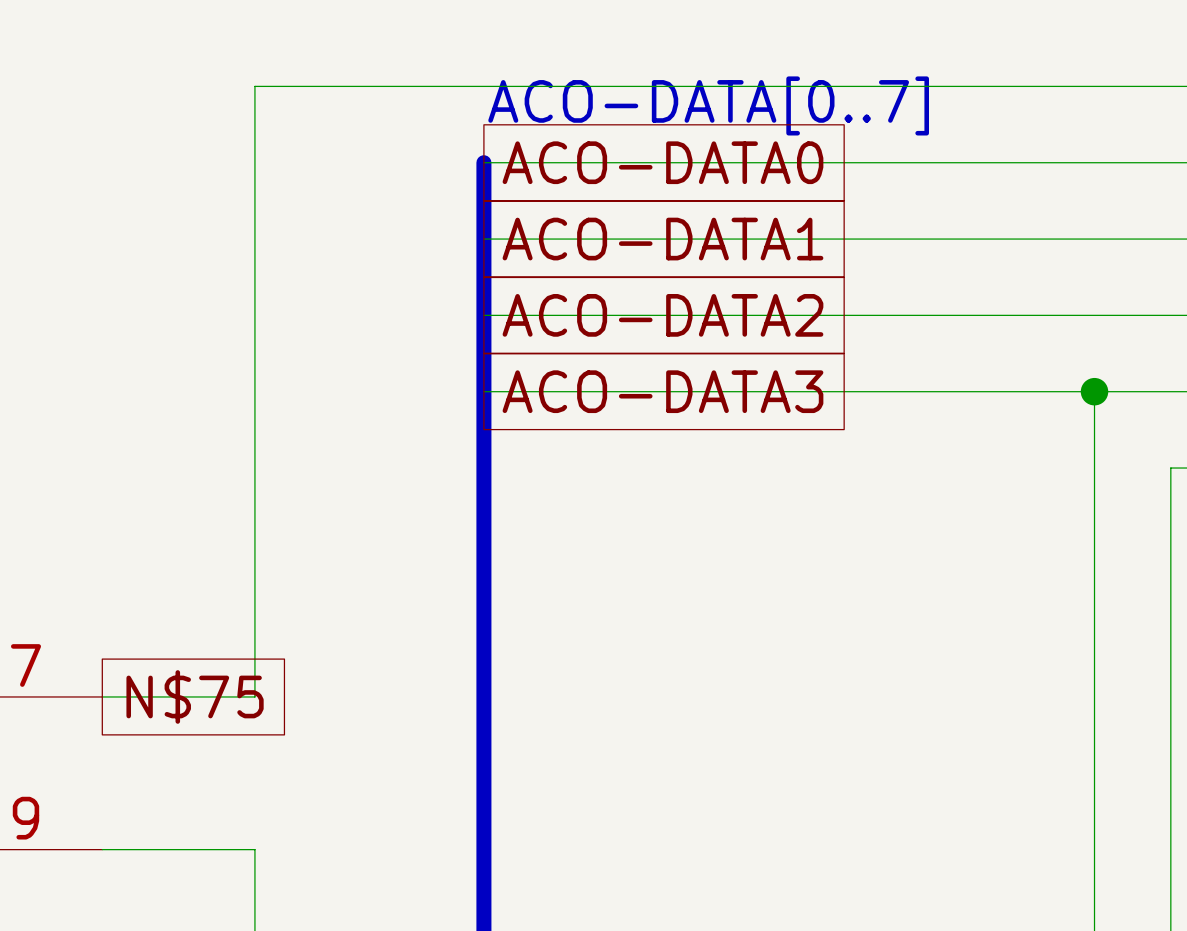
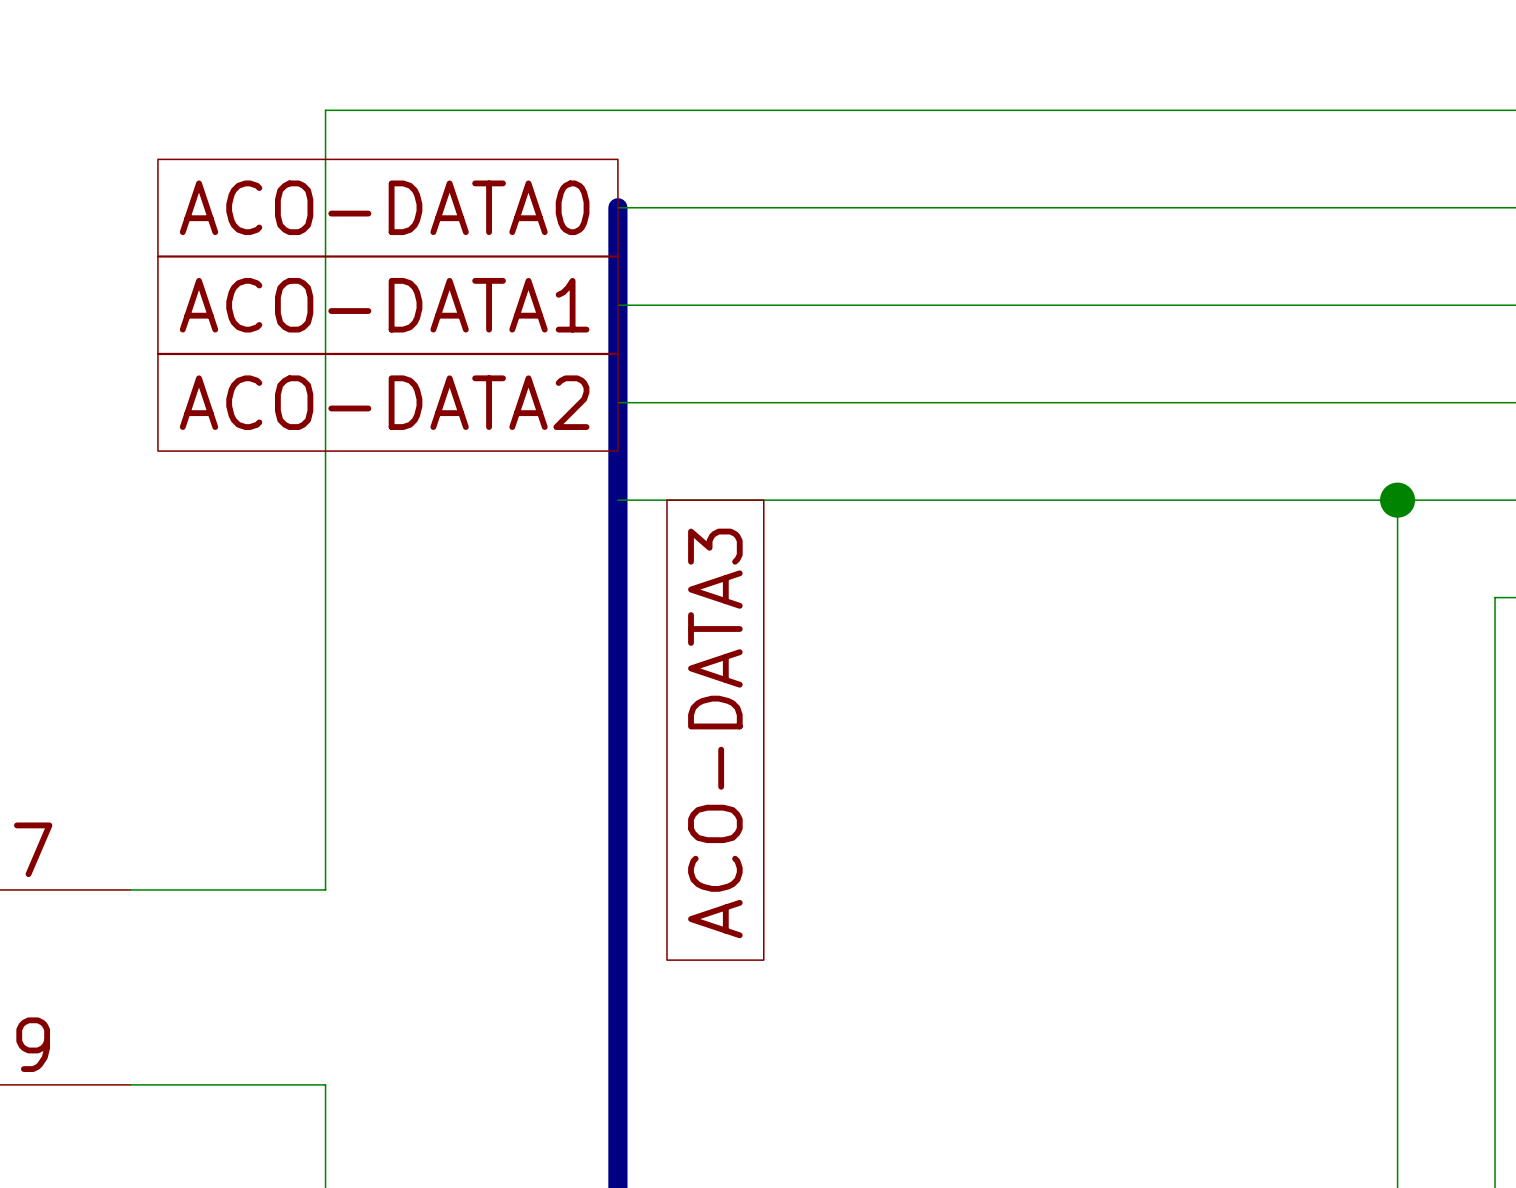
text: ACO-DATA[0..7] (708, 105) -> none
global label rotation: 0° (662, 162) -> 180° (384, 207)
global label rotation: 0° (662, 239) -> 180° (384, 305)
global label rotation: 0° (662, 315) -> 180° (384, 402)
global label rotation: 0° (662, 391) -> 90° clockwise (715, 733)
global label: N$75 (195, 696) -> none

